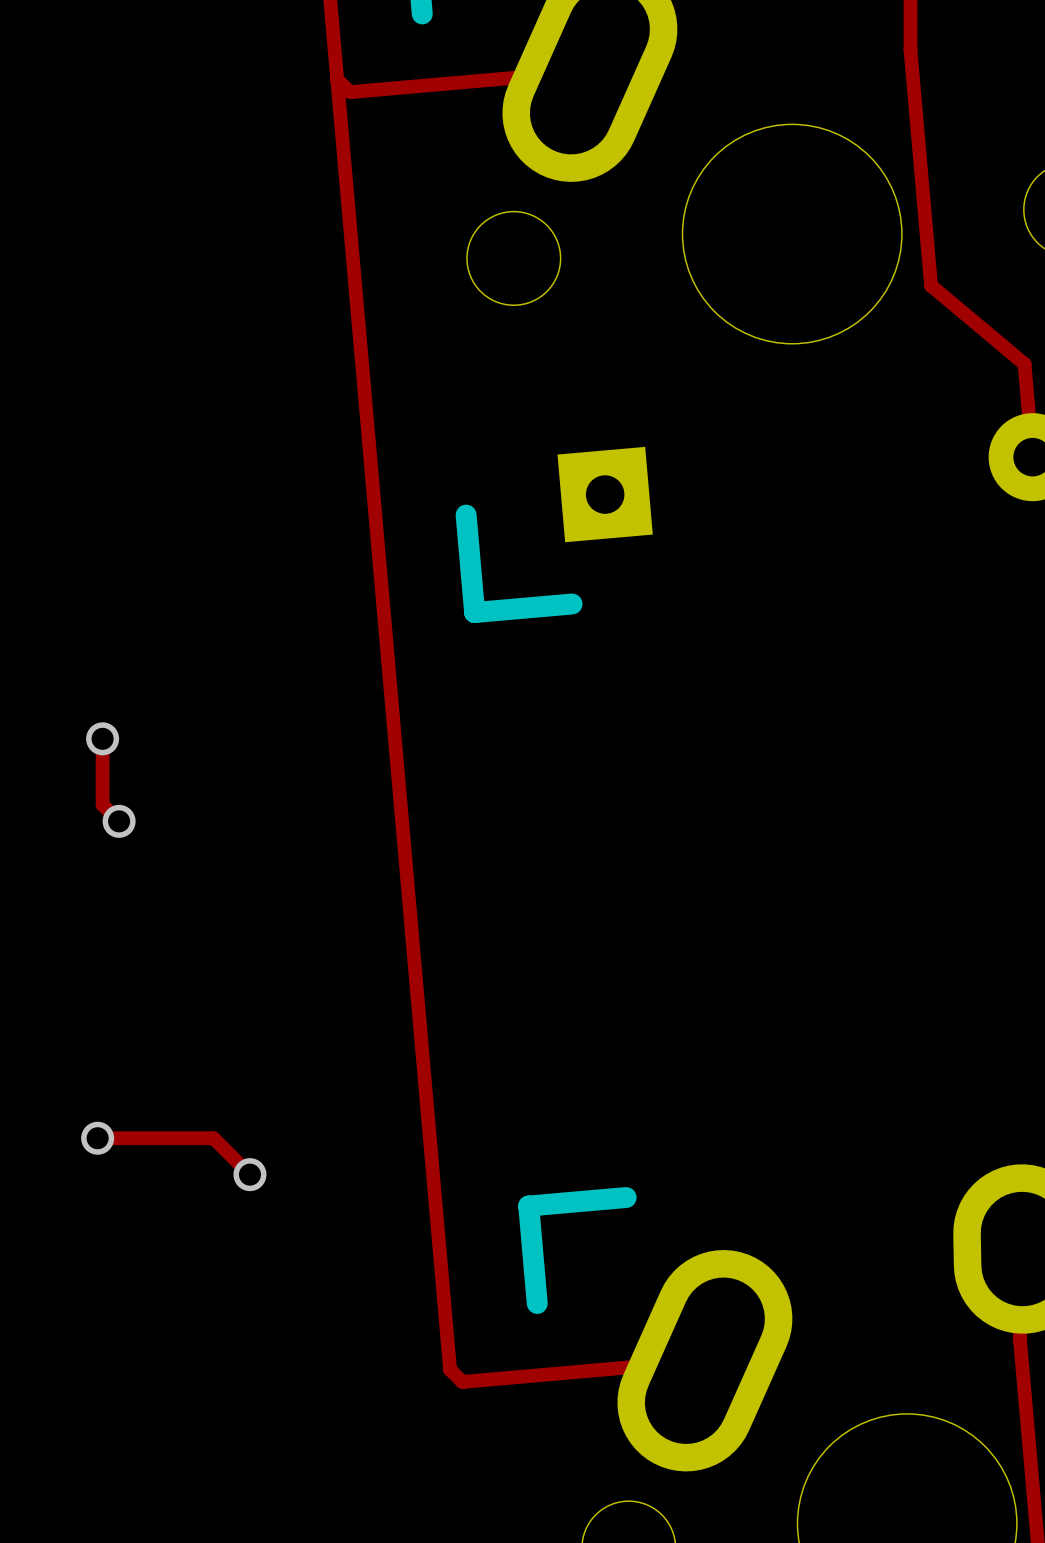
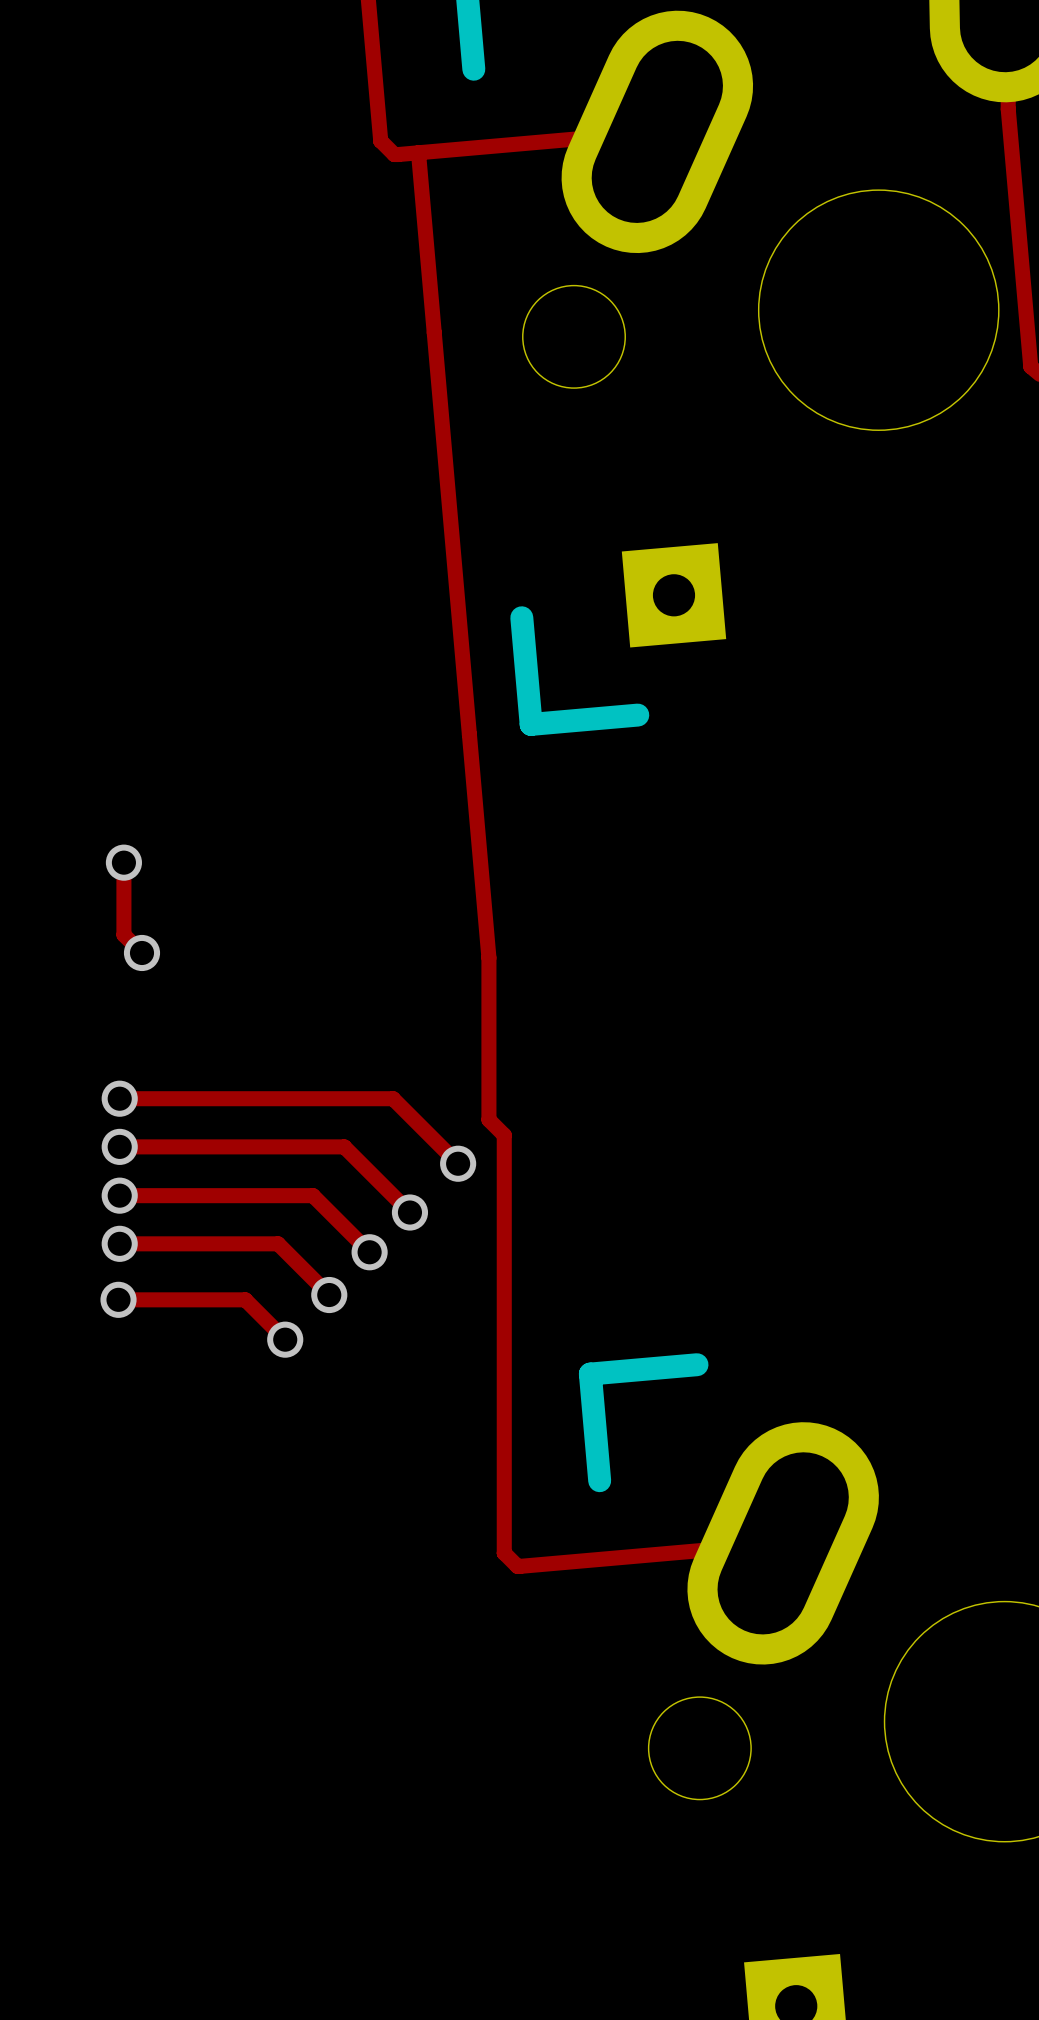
track: (337, 79) (450, 1369) -> (418, 152) (488, 957) (488, 1119) (504, 1135) (504, 1553)
track: none -> (119, 1098) (393, 1098) (458, 1163)
via: none -> (119, 1098)
track: none -> (119, 1146) (344, 1146) (409, 1212)
via: none -> (119, 1146)
via: none -> (458, 1163)
track: none -> (119, 1195) (313, 1195) (369, 1252)
via: none -> (119, 1195)
via: none -> (409, 1212)
track: none -> (119, 1243) (278, 1243) (329, 1295)
via: none -> (119, 1243)
via: none -> (369, 1252)
via: none -> (329, 1295)

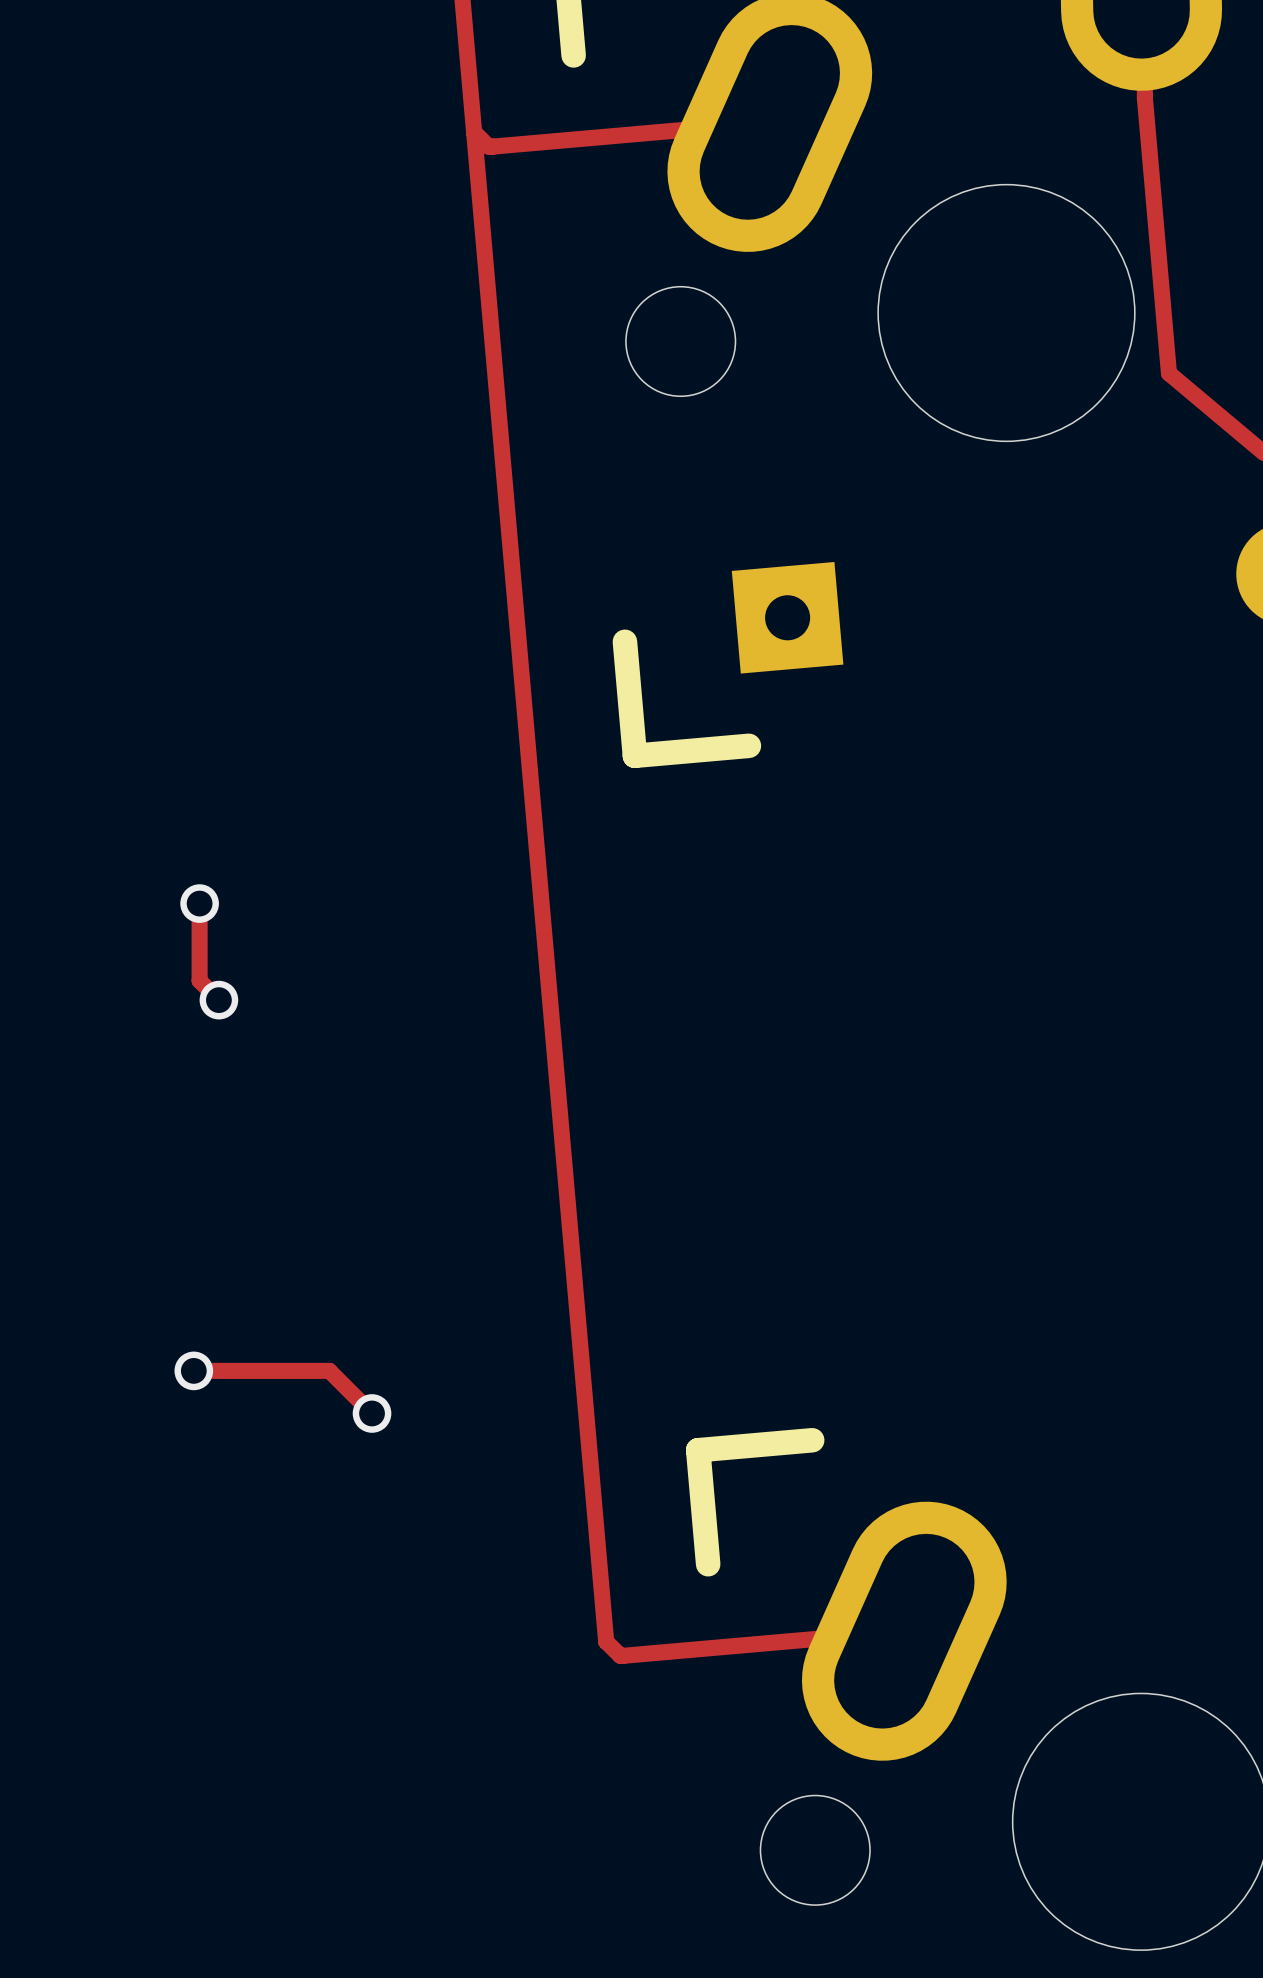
track: (418, 152) (488, 957) (488, 1119) (504, 1135) (504, 1553) -> (474, 132) (606, 1641)
track: (119, 1098) (393, 1098) (458, 1163) -> none
via: (119, 1098) -> none
track: (119, 1146) (344, 1146) (409, 1212) -> none
via: (119, 1146) -> none
via: (458, 1163) -> none
track: (119, 1195) (313, 1195) (369, 1252) -> none
via: (119, 1195) -> none
via: (409, 1212) -> none
track: (119, 1243) (278, 1243) (329, 1295) -> none
via: (119, 1243) -> none
via: (369, 1252) -> none
via: (329, 1295) -> none

